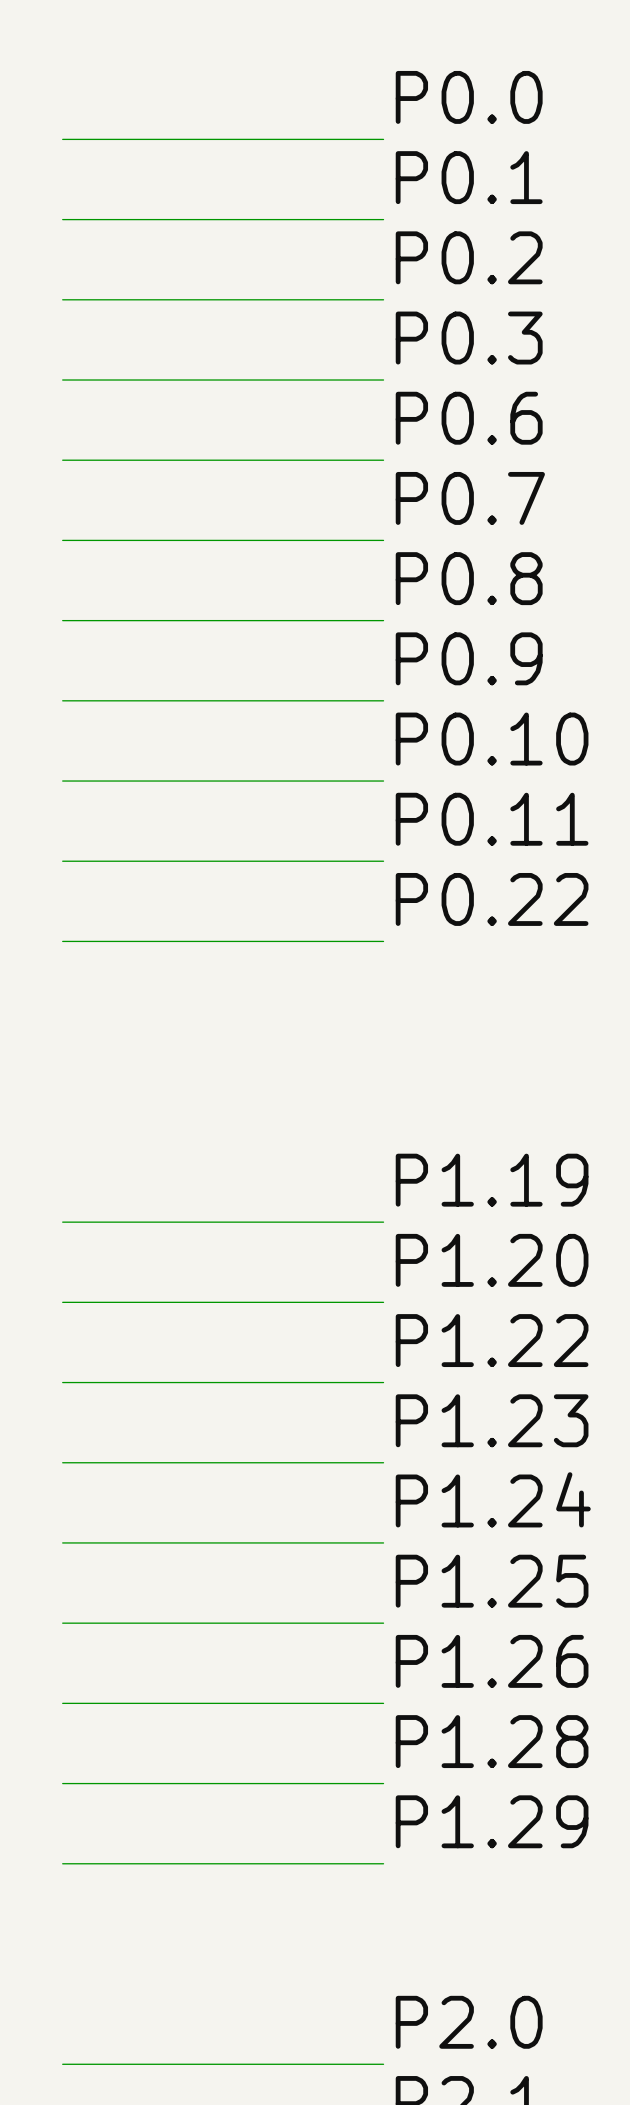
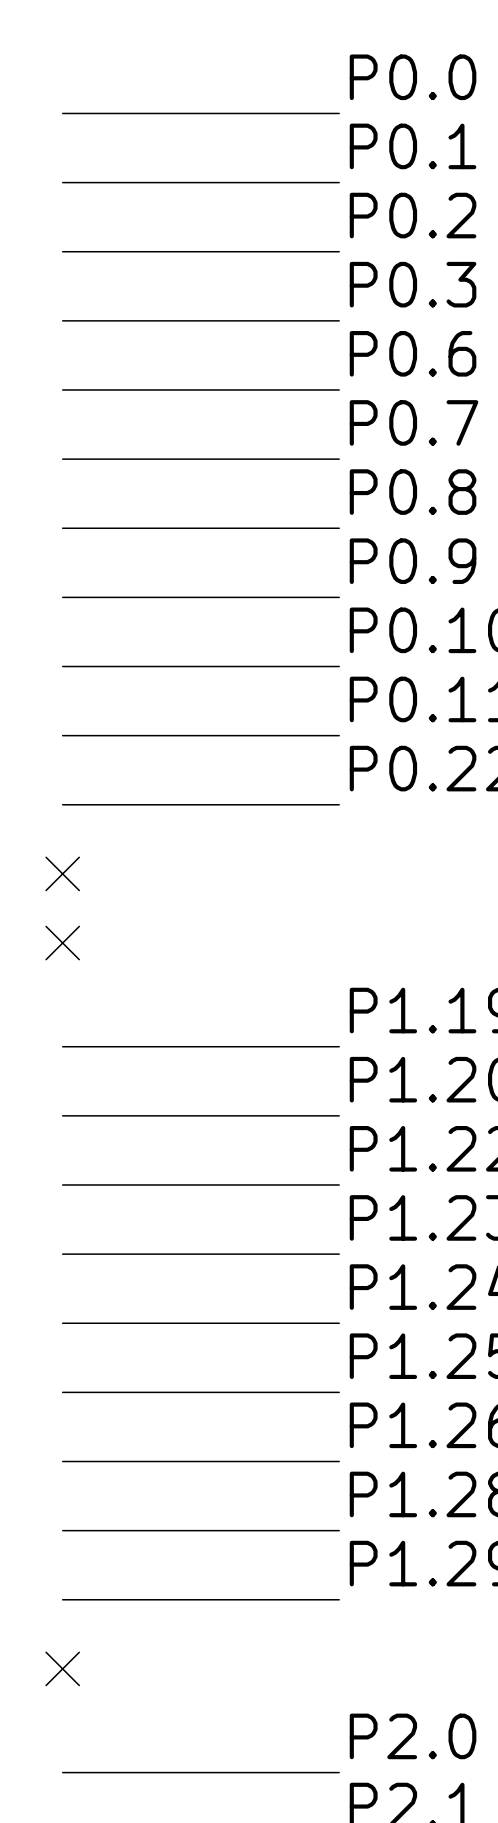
no-connect mark: none -> (62, 873)
no-connect mark: none -> (62, 943)
no-connect mark: none -> (62, 1668)

